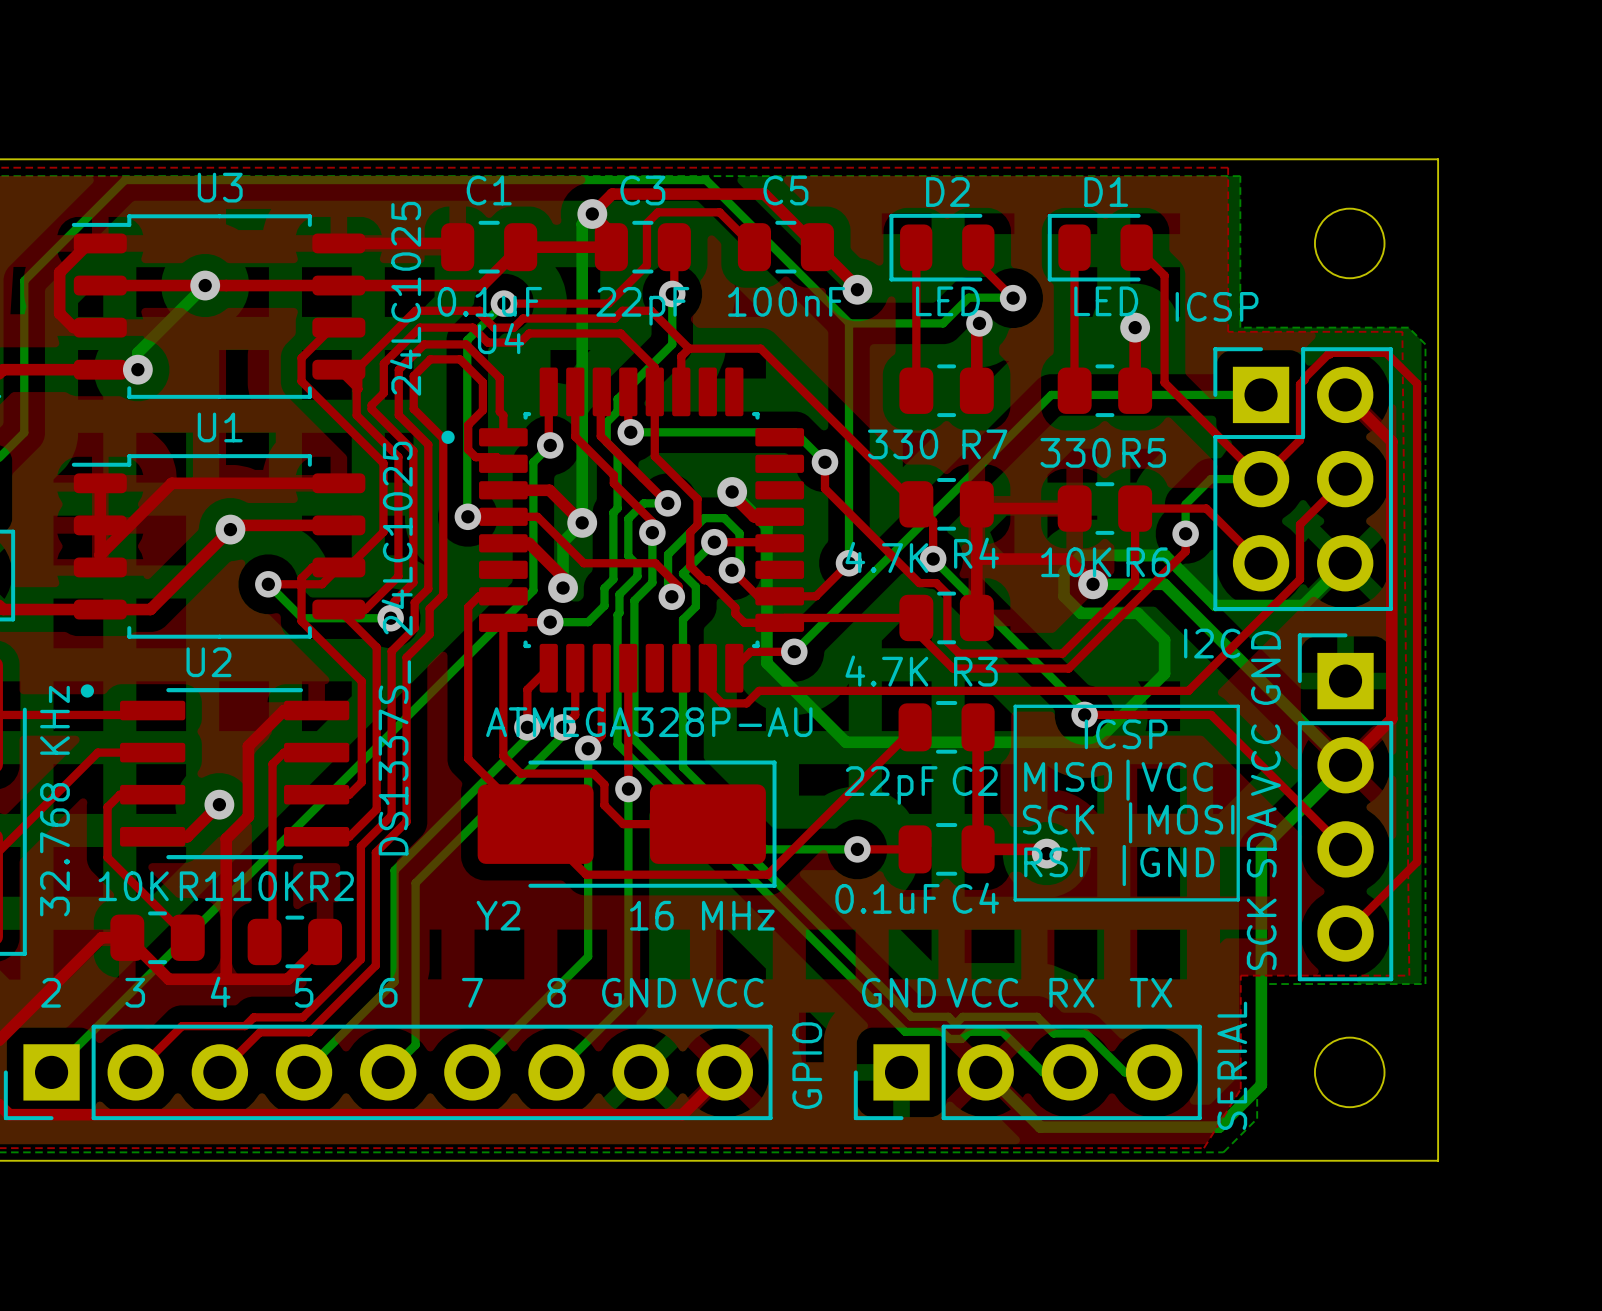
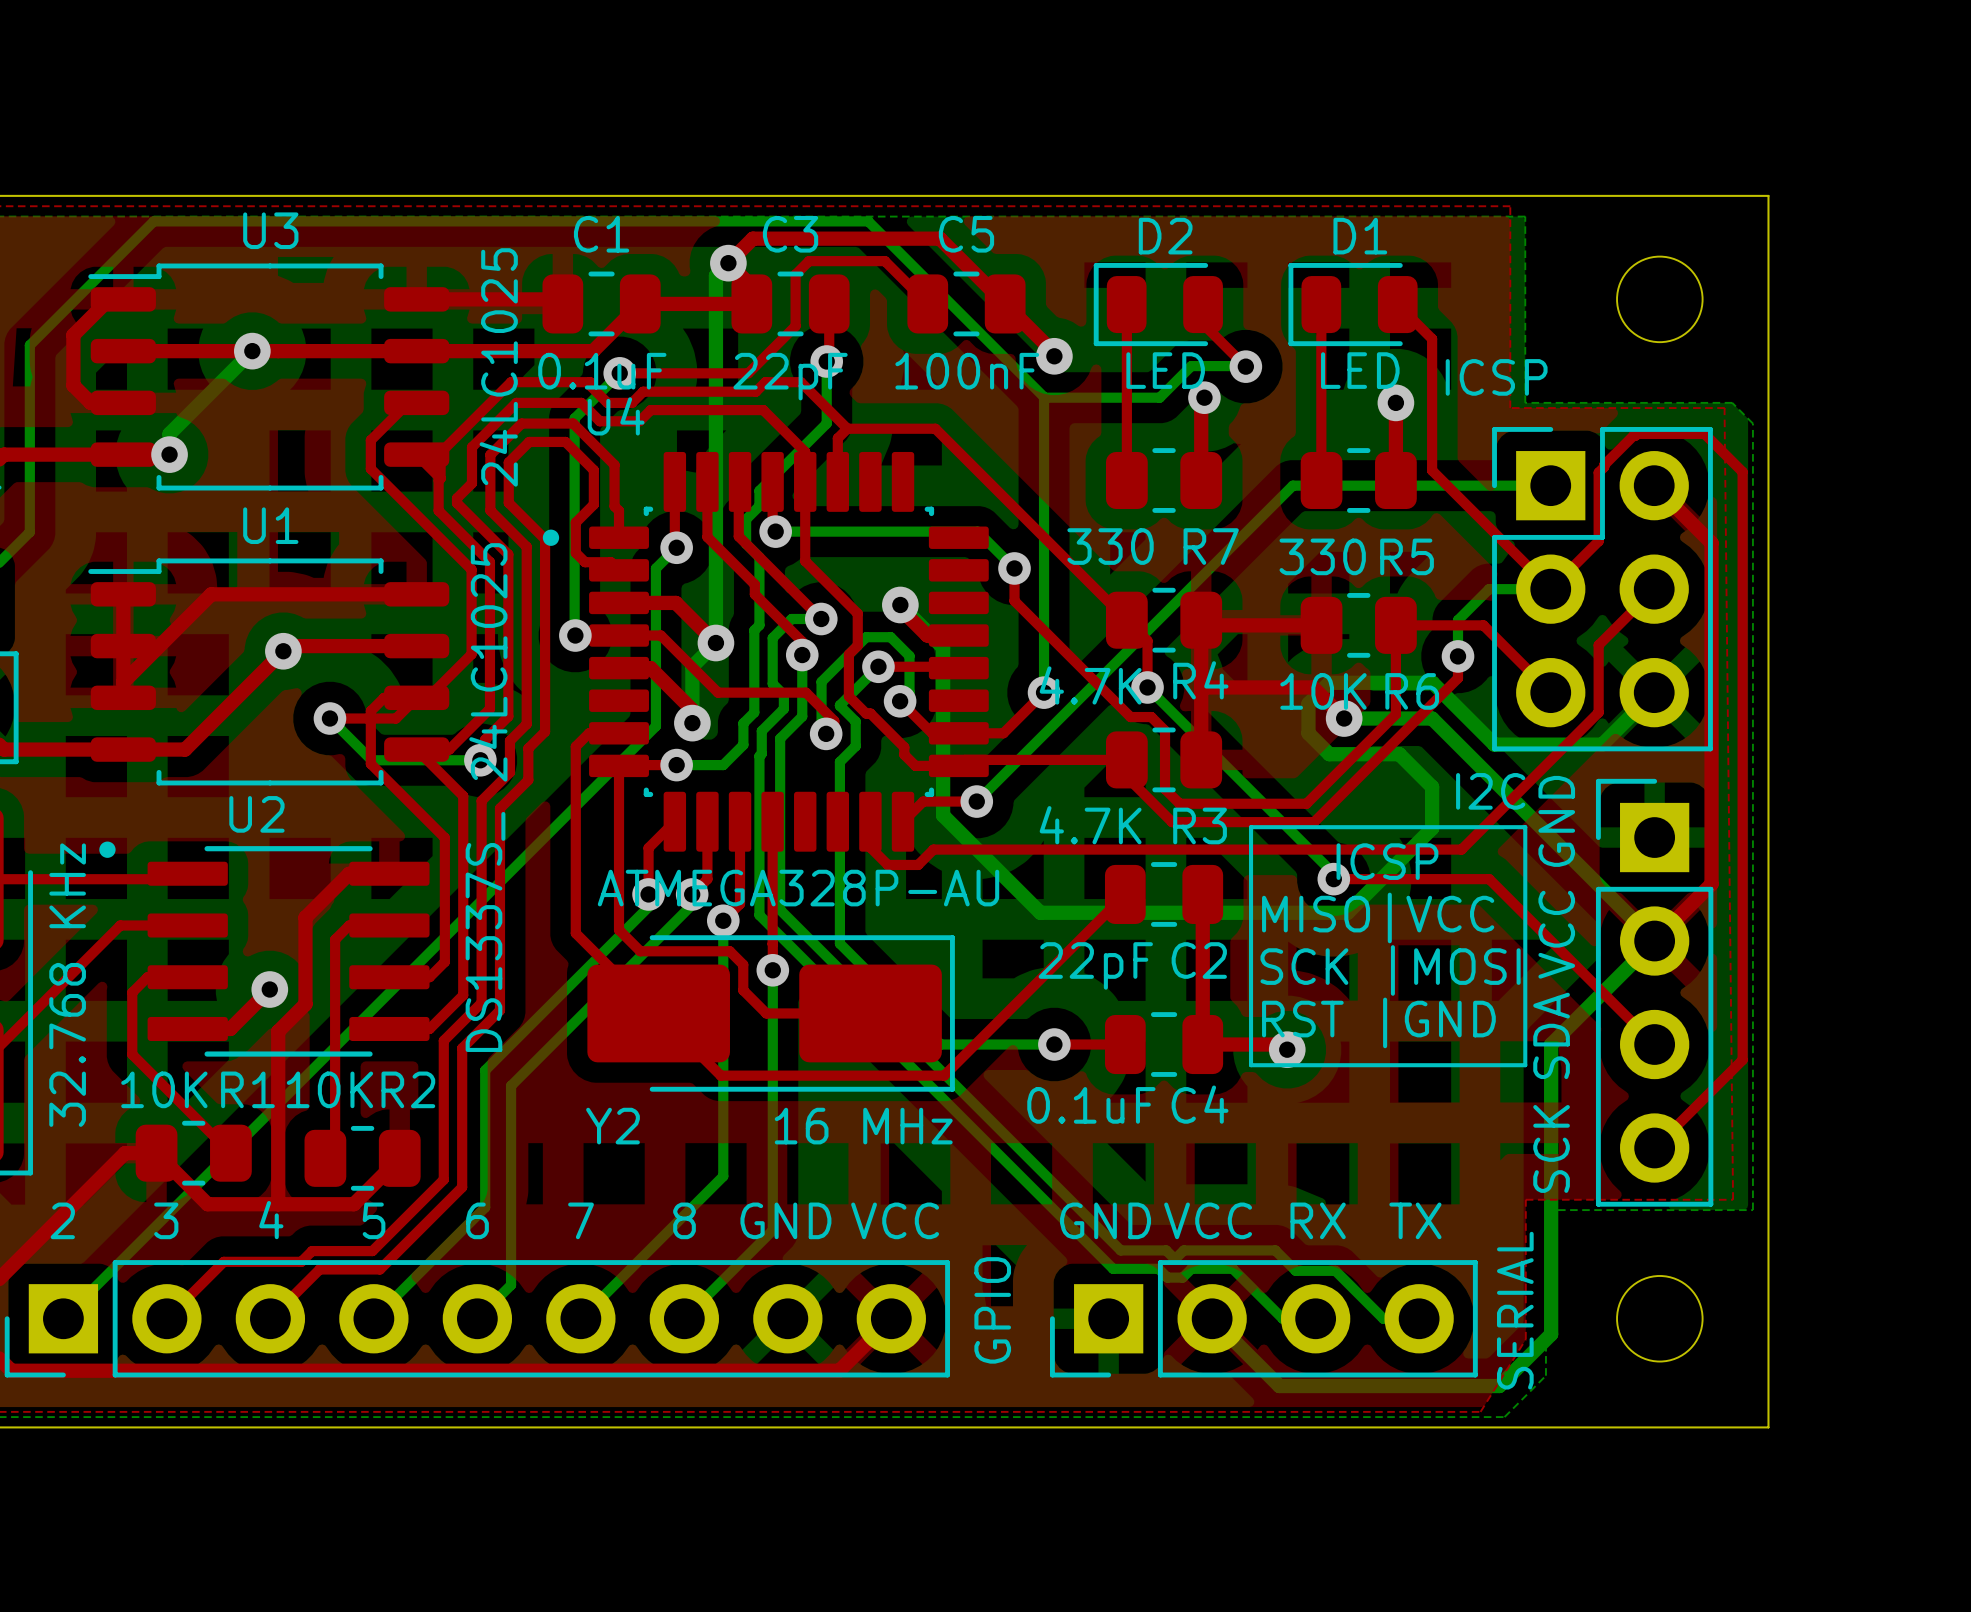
text: none -> ICSP (1387, 861)
line: (1015, 706) (1238, 706) (1238, 899) (1015, 899) (1015, 706) -> (1251, 827) (1251, 1065) (1525, 1065) (1525, 827) (1251, 827)
text: ICSP (1126, 734) -> MISO|VCC (1378, 917)
text: MISO|VCC (1118, 780) -> SCK |MOSI (1390, 970)
text: SCK |MOSI (1128, 822) -> RST |GND (1378, 1022)
text: RST |GND (1119, 865) -> none

